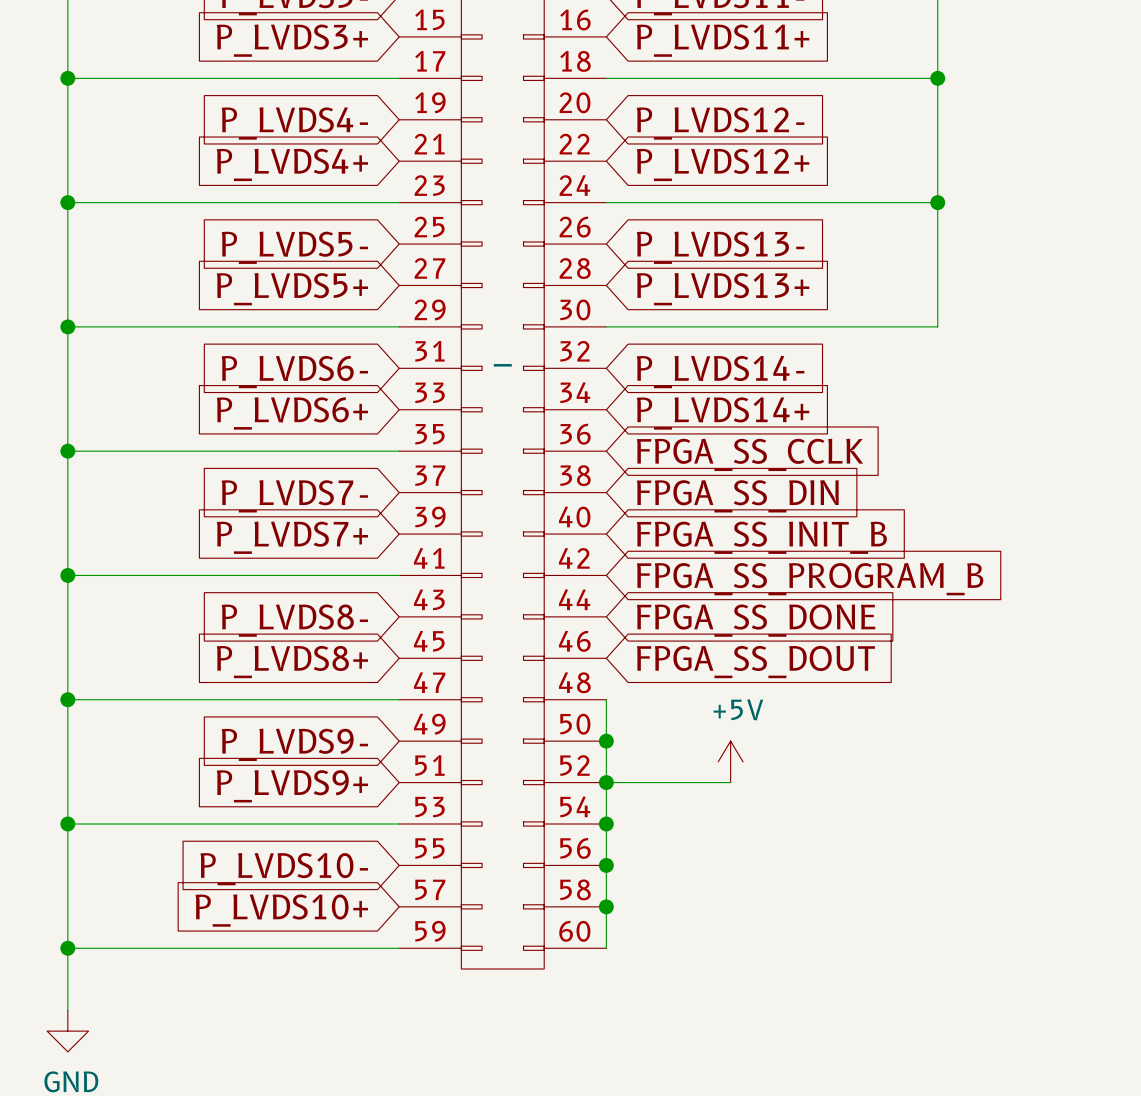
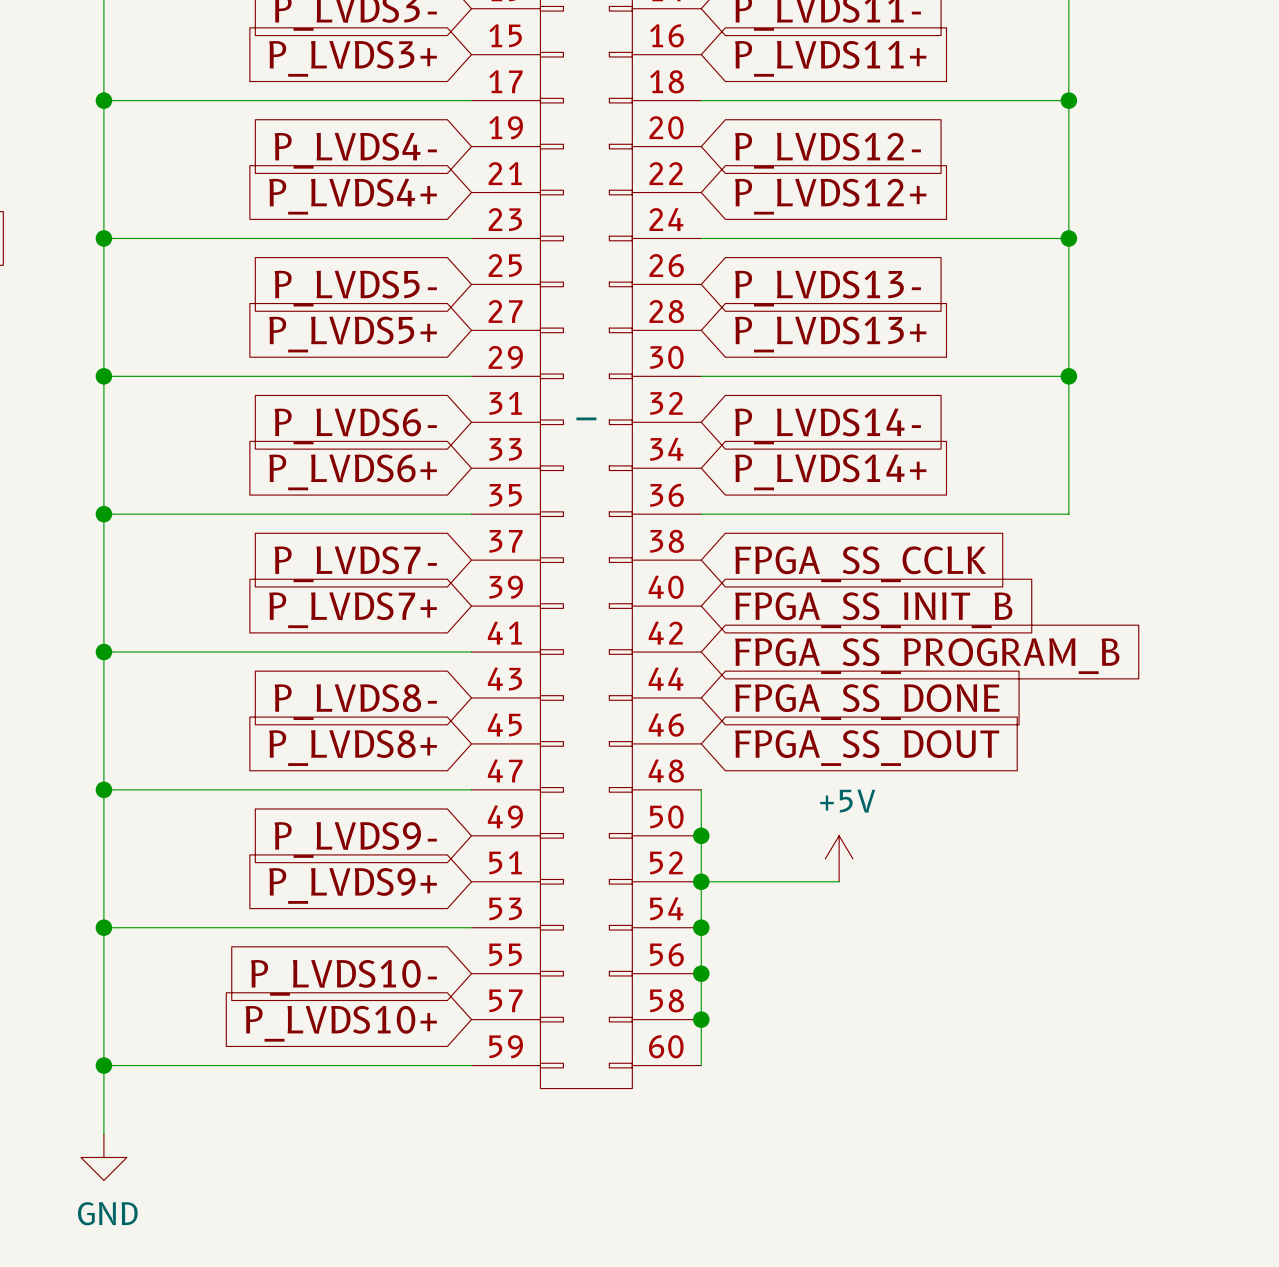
wire: none -> (1068, 376) (1068, 514) (701, 514)
junction: none -> (1068, 376)
global label: FPGA_SS_CCLK (750, 454) -> none
global label: FPGA_SS_DIN (737, 496) -> FPGA_SS_CCLK (860, 564)

